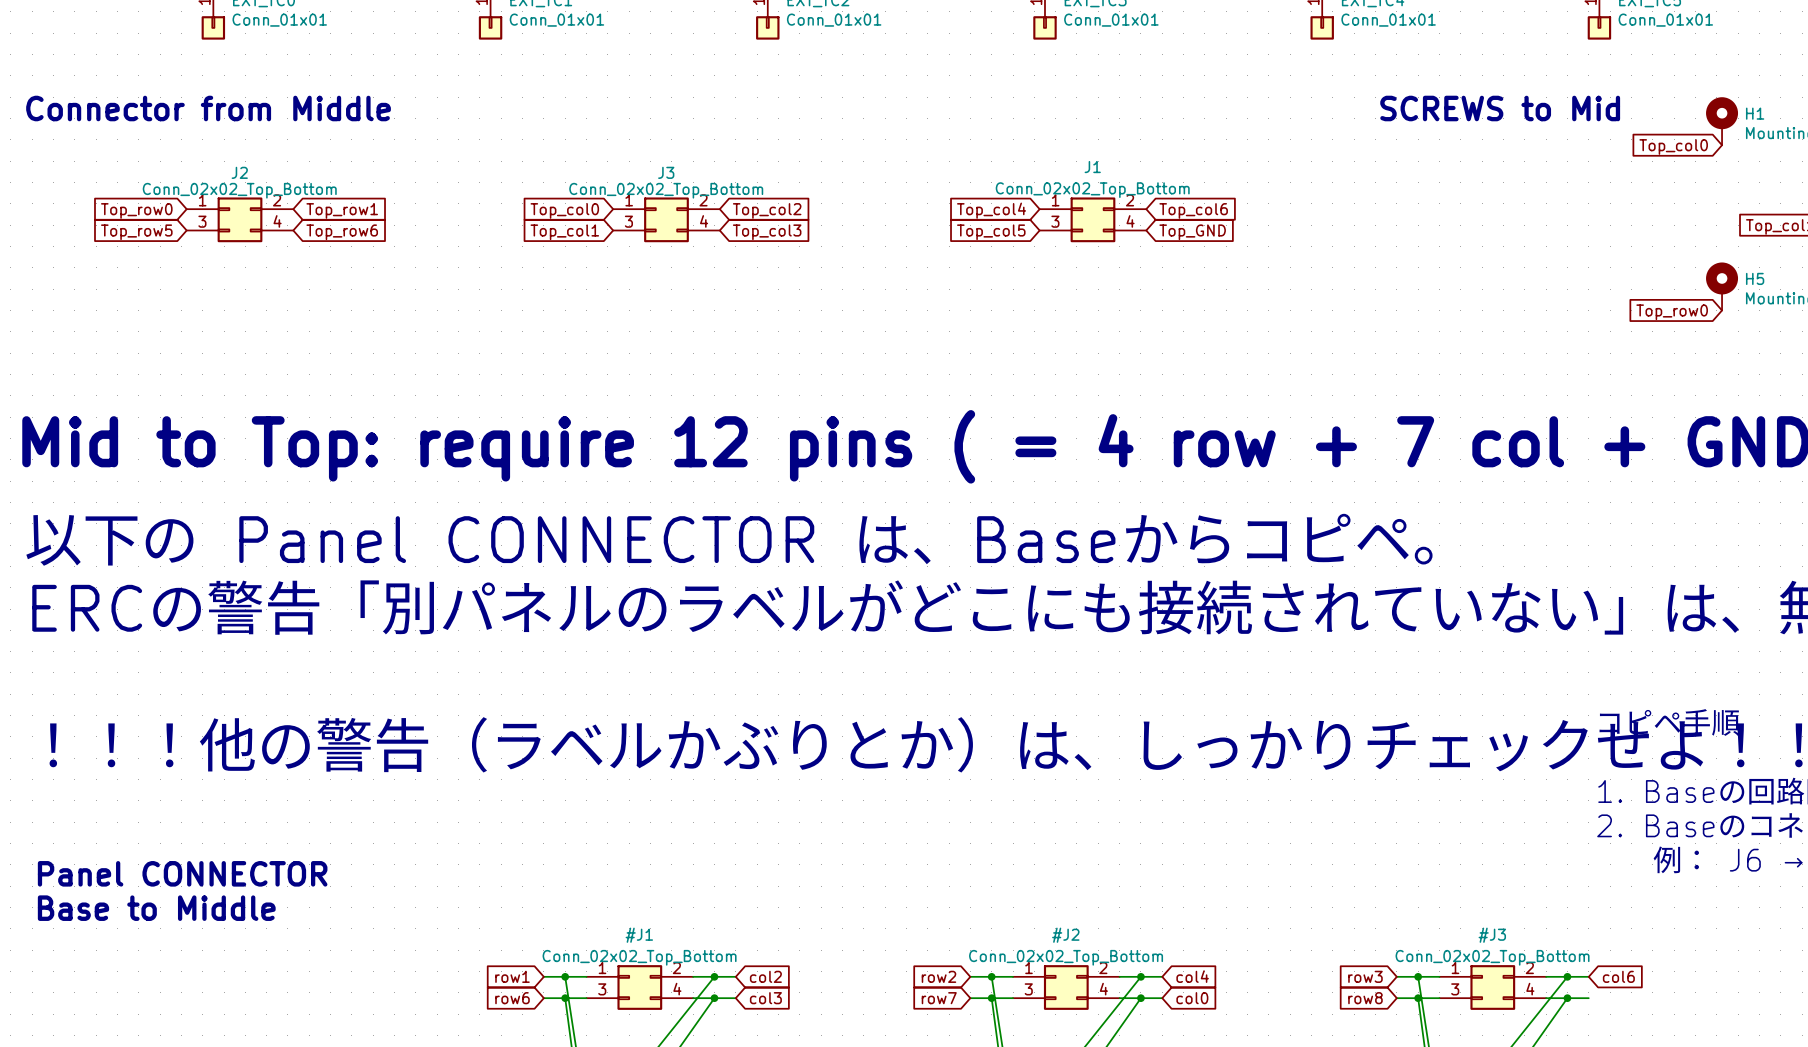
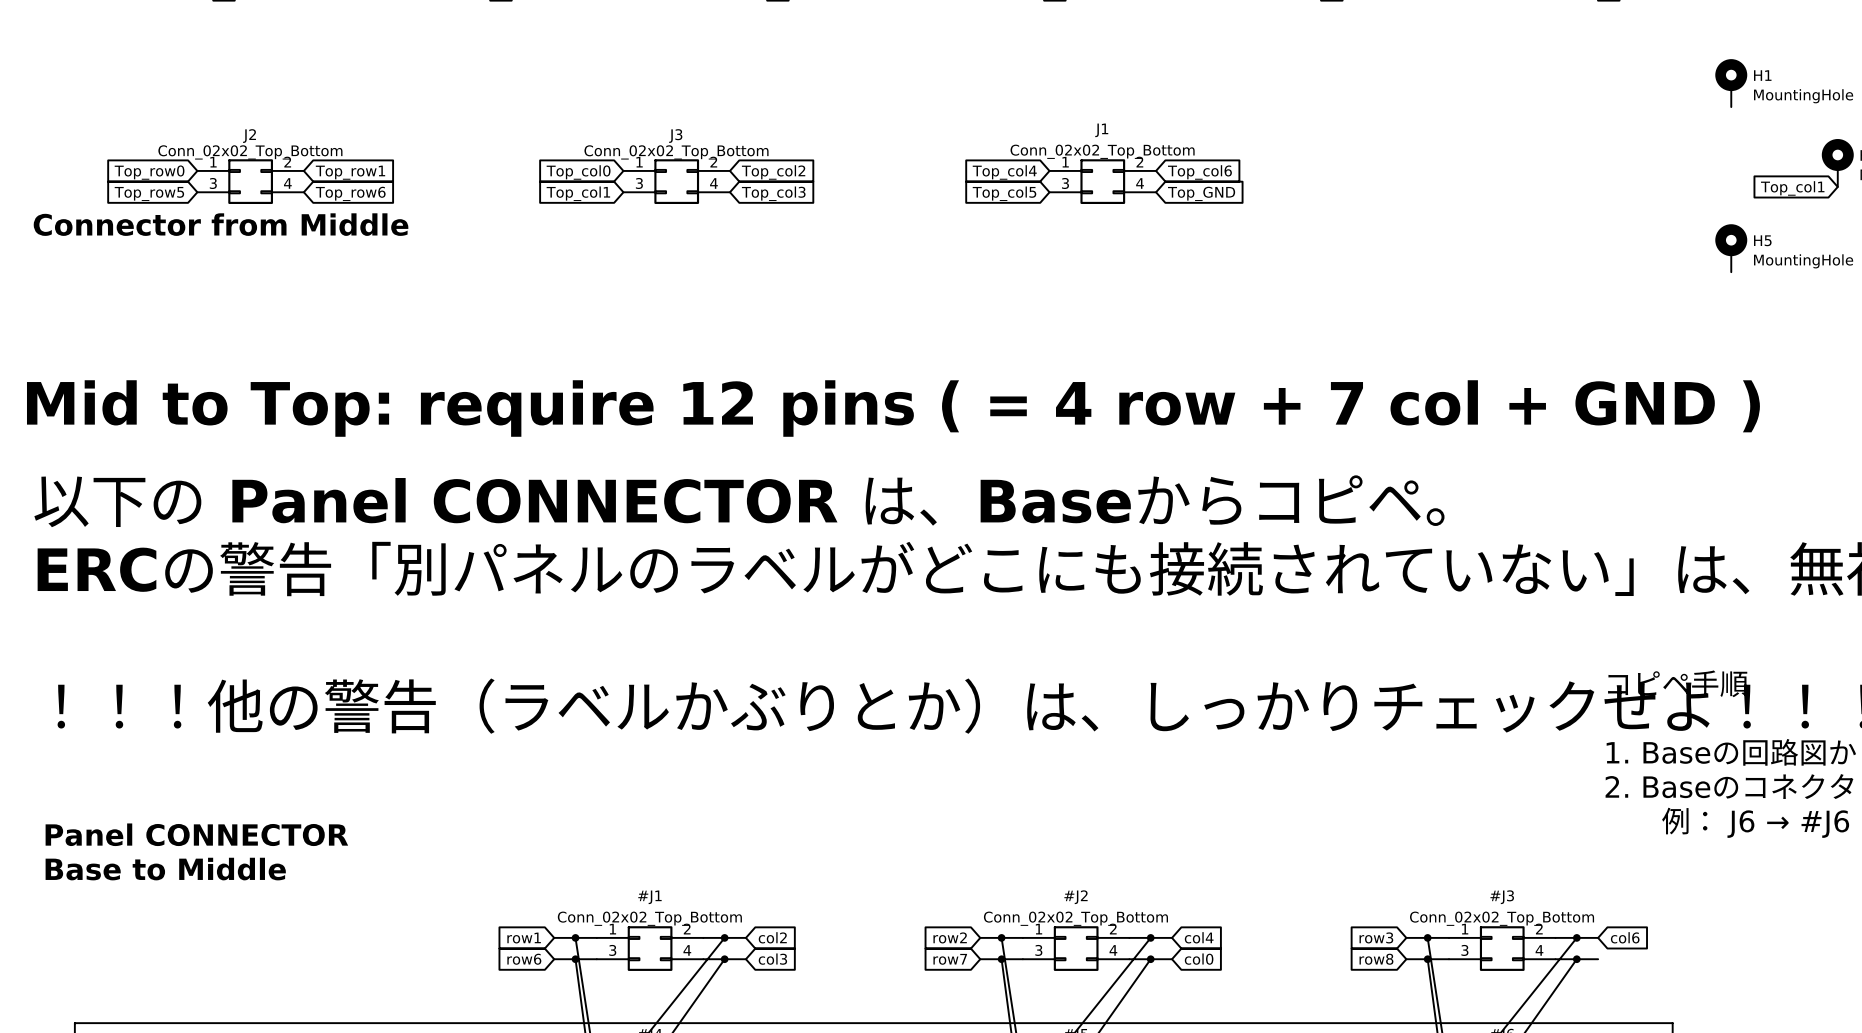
text position: Connector from Middle (208, 108) -> Connector from Middle (221, 224)
text: SCREWS to Mid (1500, 108) -> none
global label: Top_col0 (1673, 146) -> none
global label: Top_row0 (1672, 312) -> none

